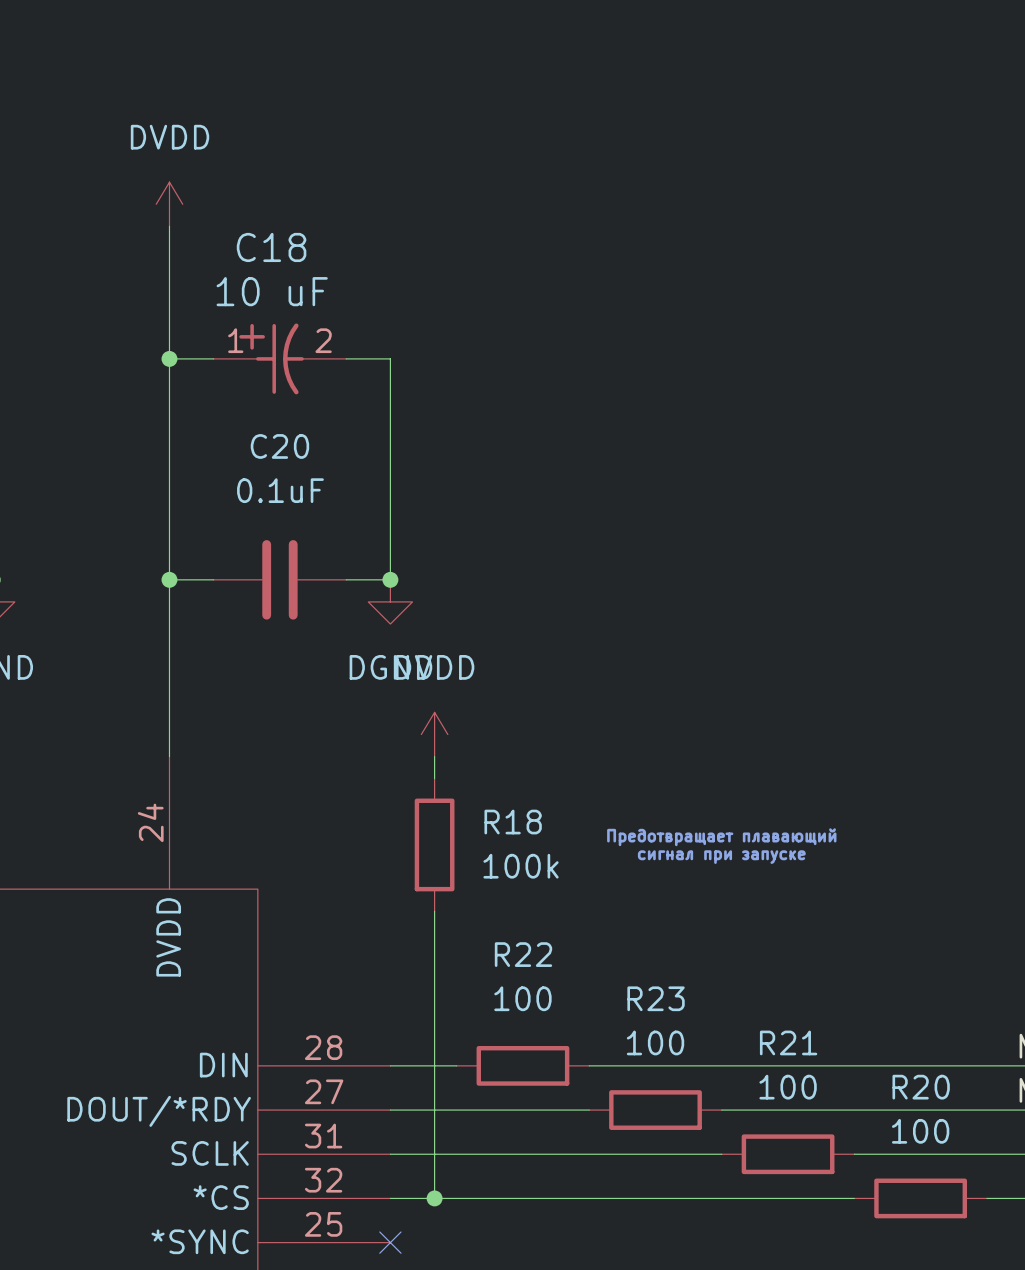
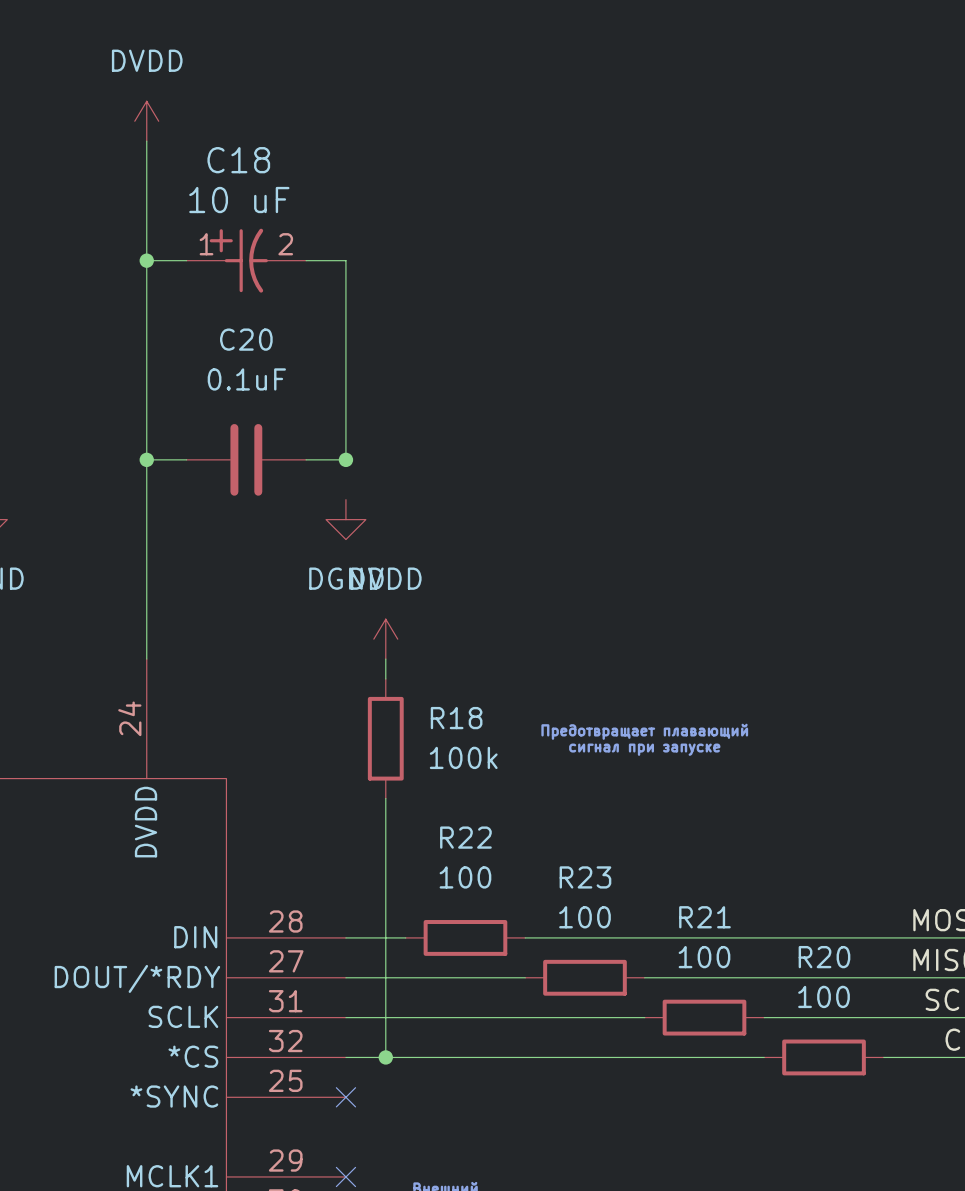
power symbol position: DVDD (169, 204) -> DVDD (146, 121)
wire: (169, 358) (213, 358) -> (146, 260) (186, 260)
junction position: (169, 358) -> (146, 260)
C18 position: (279, 358) -> (246, 260)
wire: (346, 358) (390, 358) -> (306, 260) (345, 260) (345, 300)
wire: (390, 535) (390, 579) (346, 579) -> (345, 459) (306, 459)
wire: (169, 579) (213, 579) -> (146, 459) (186, 459)
junction position: (169, 579) -> (146, 459)
C20 position: (279, 579) -> (246, 459)
junction position: (390, 579) -> (345, 459)

